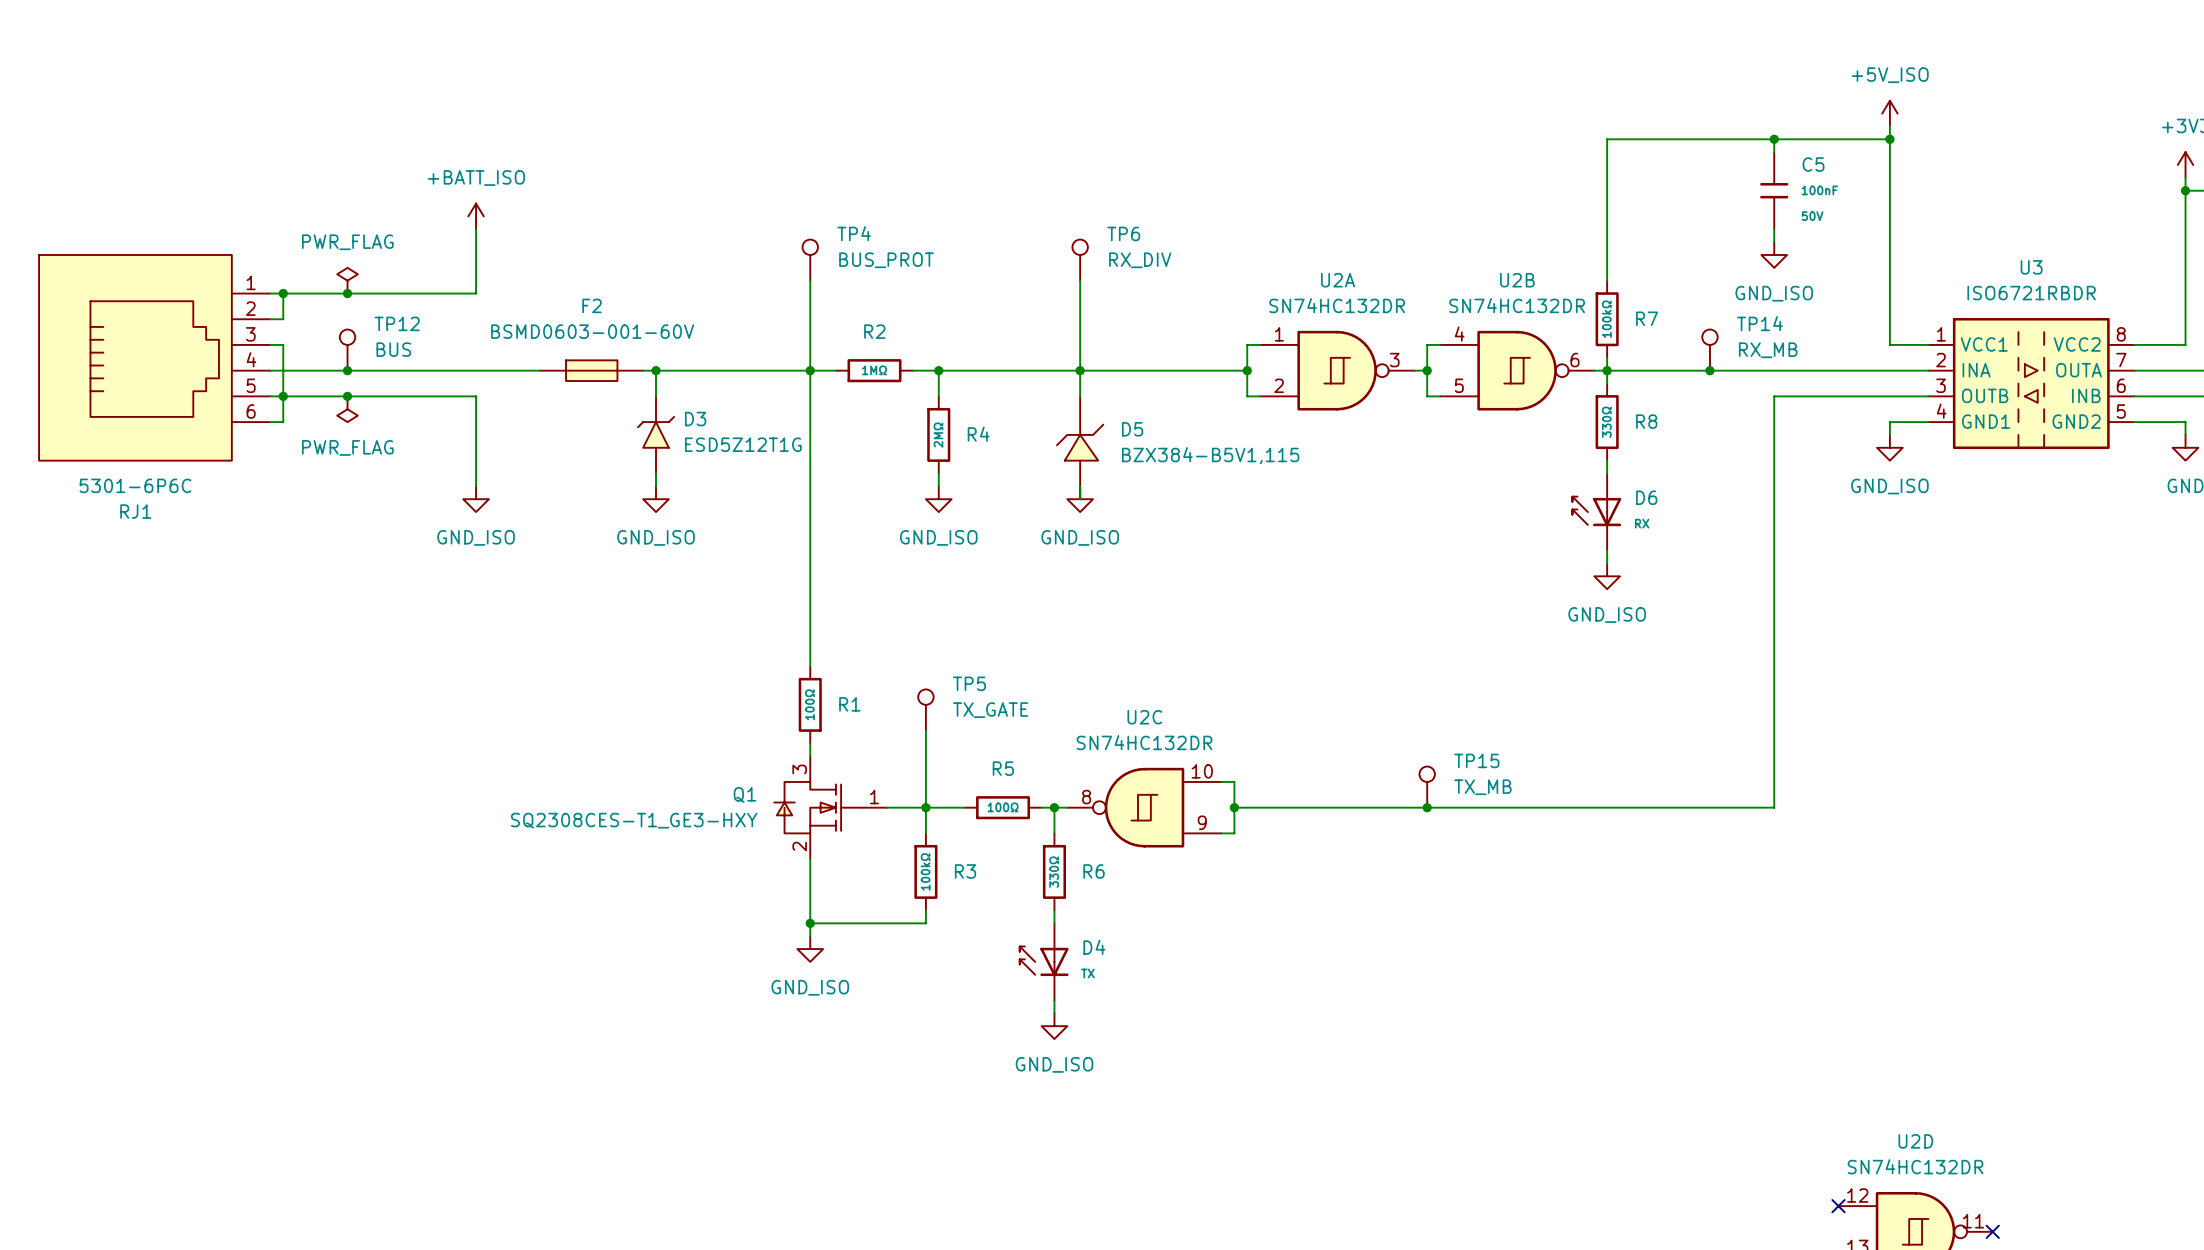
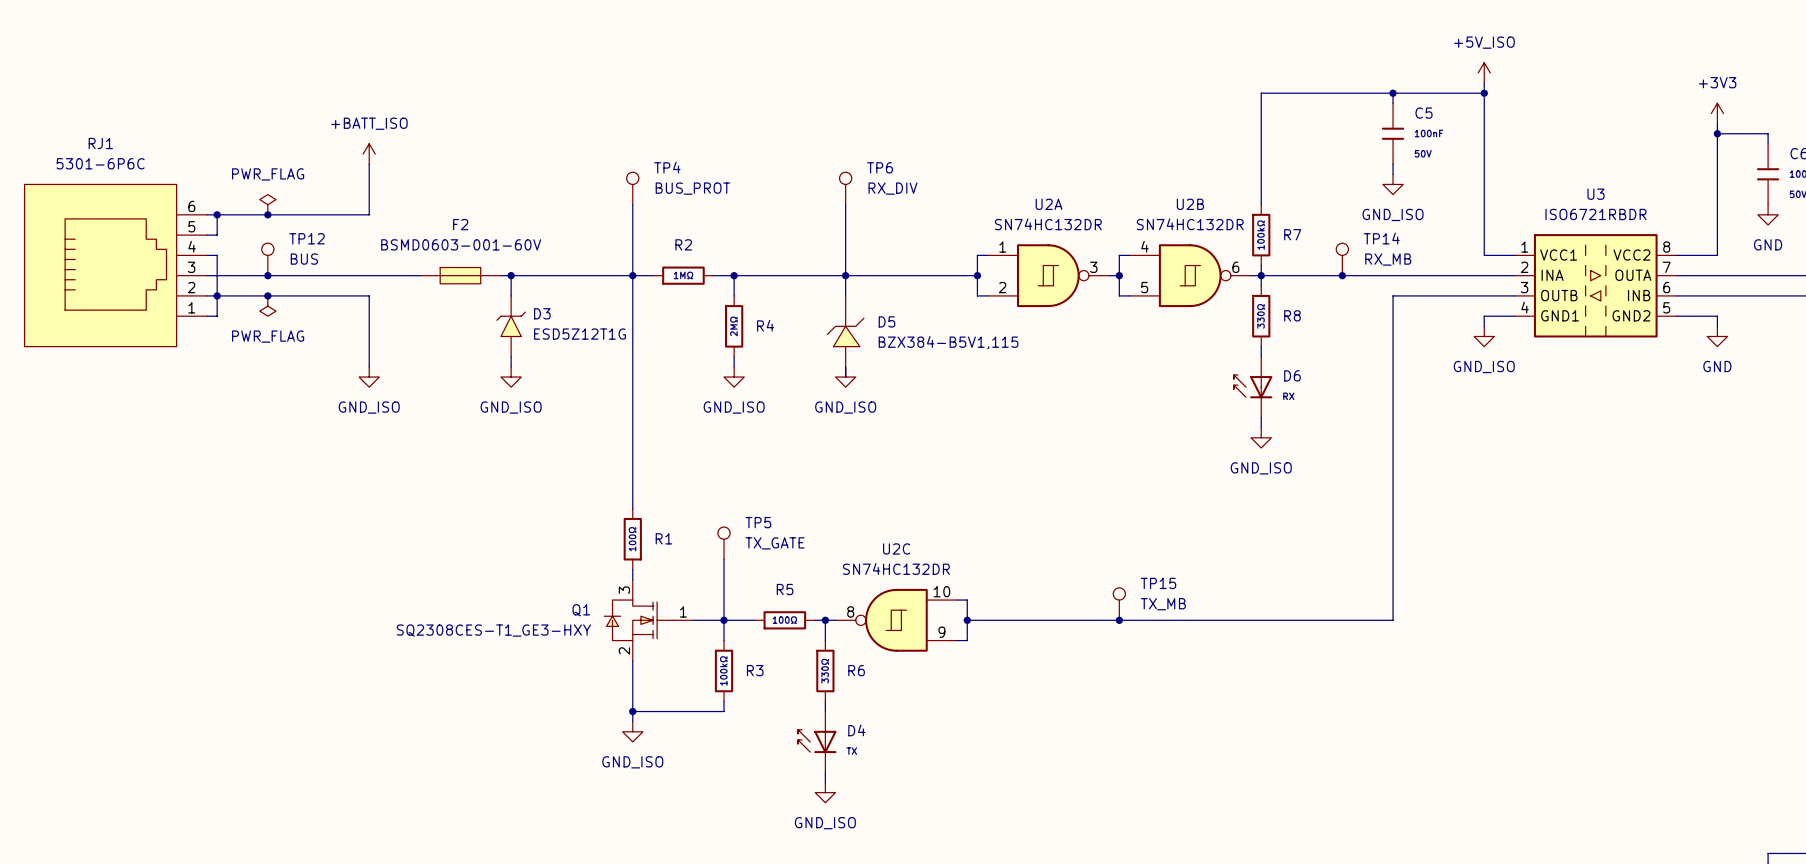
RJ1 flip: as is (135, 357) -> up-down (100, 265)

